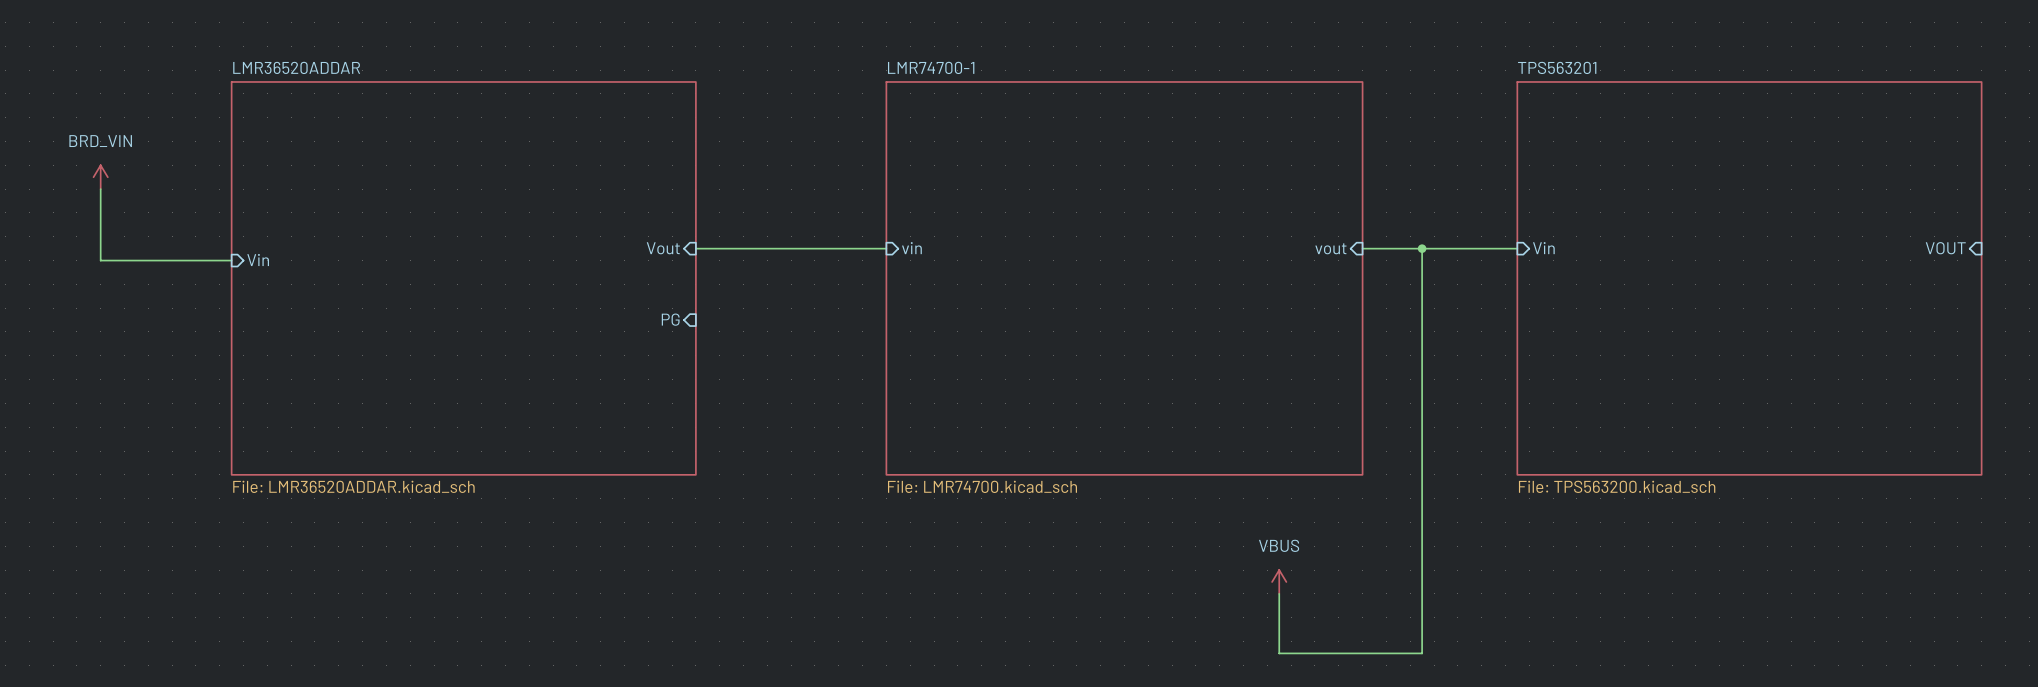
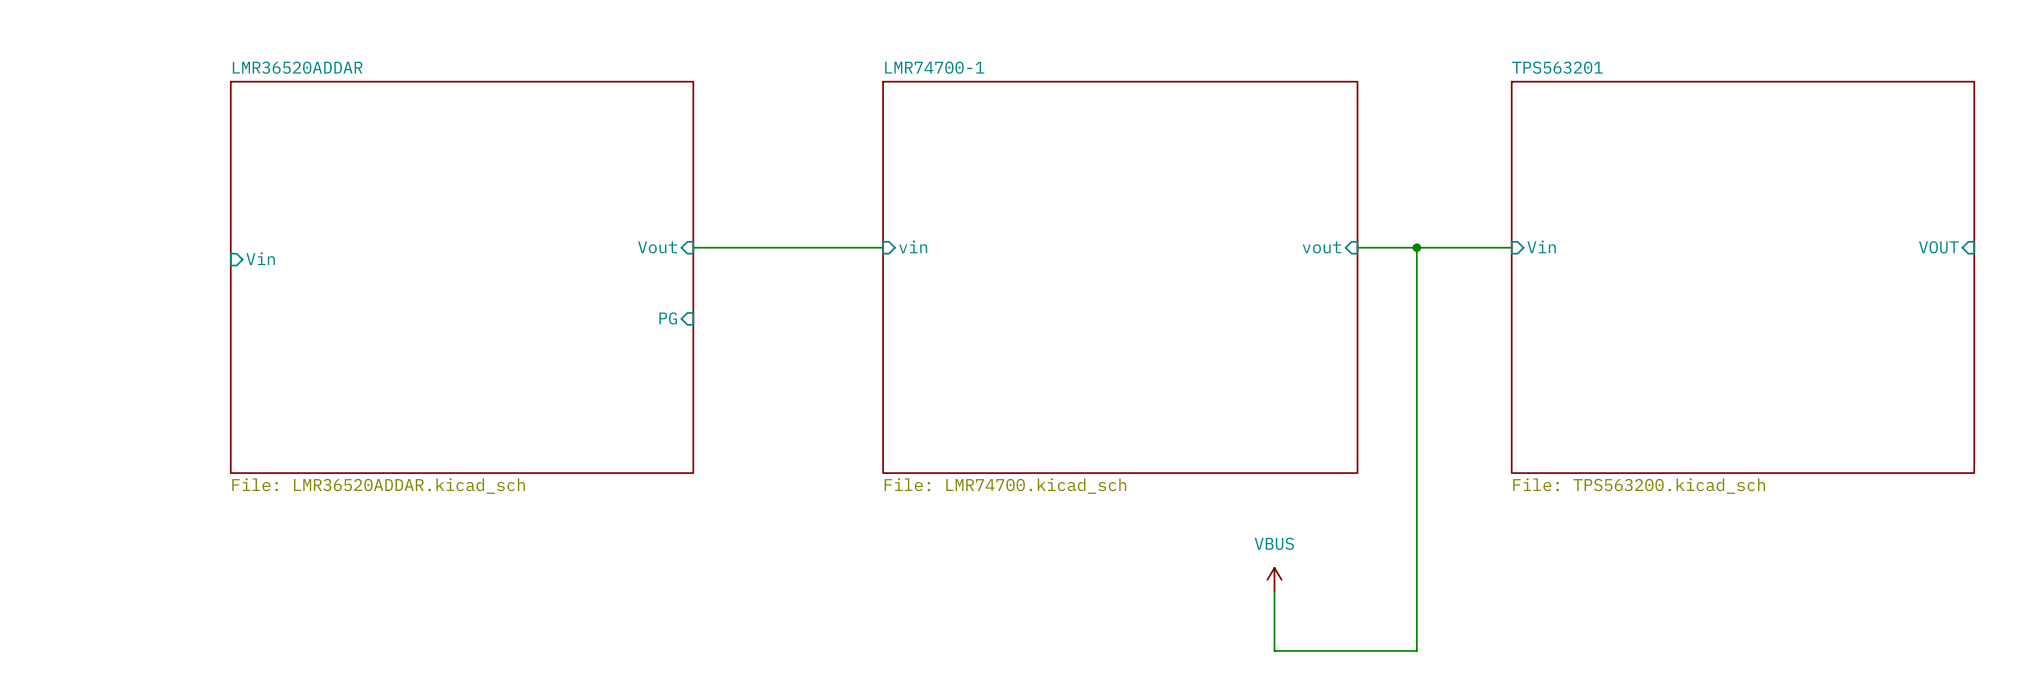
power symbol: BRD_VIN (100, 177) -> none
wire: (100, 189) (100, 260) (231, 260) -> none

